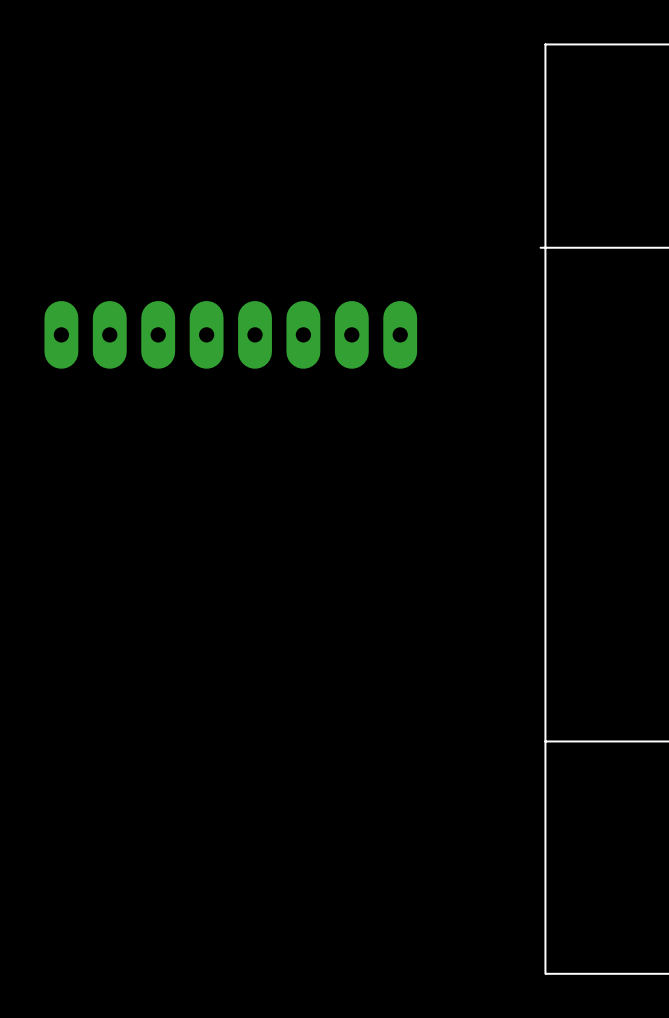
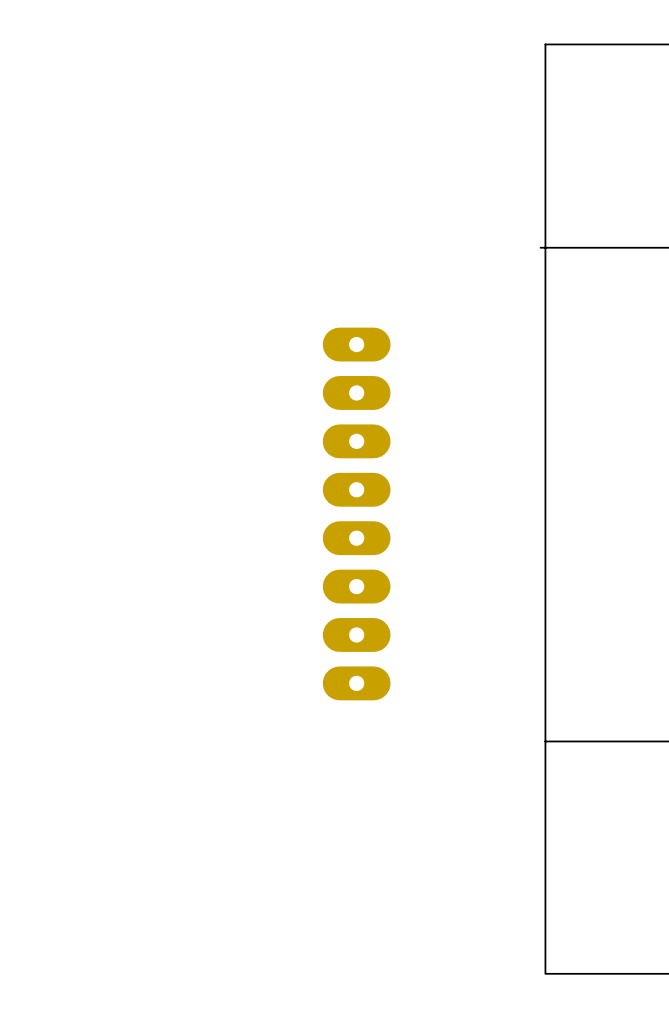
part rotation: 0° (230, 334) -> 90° clockwise (356, 513)

